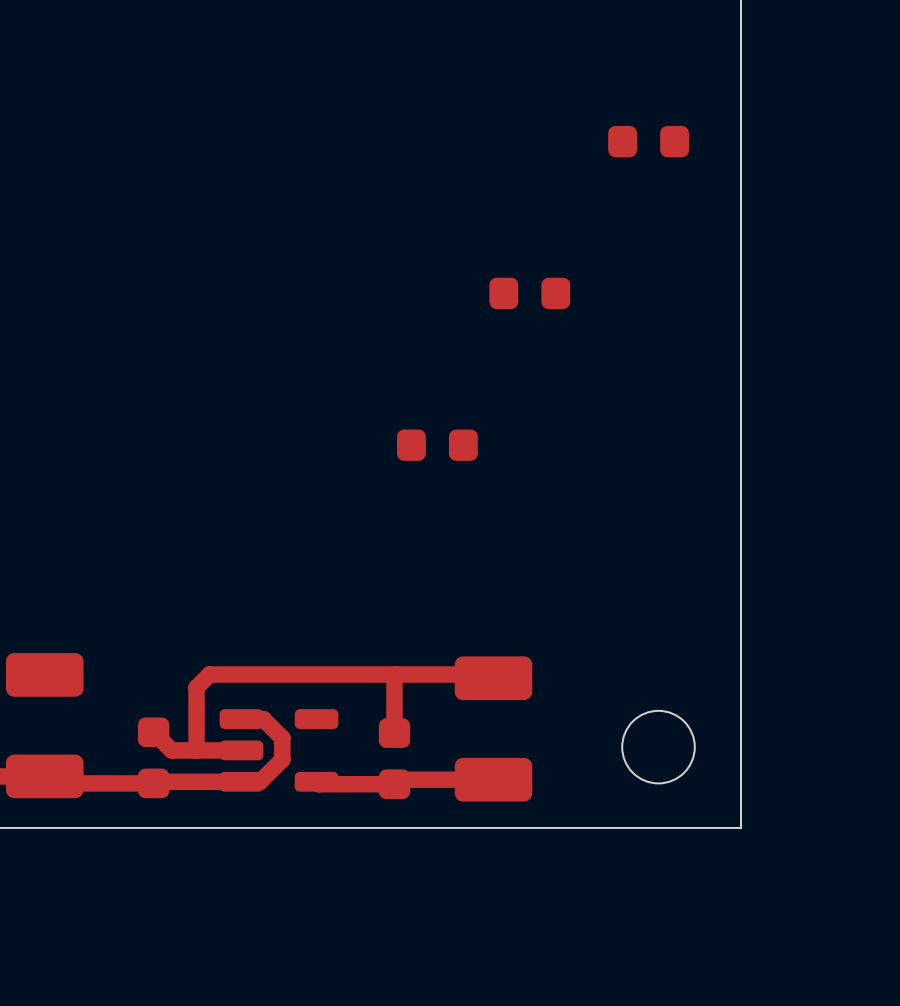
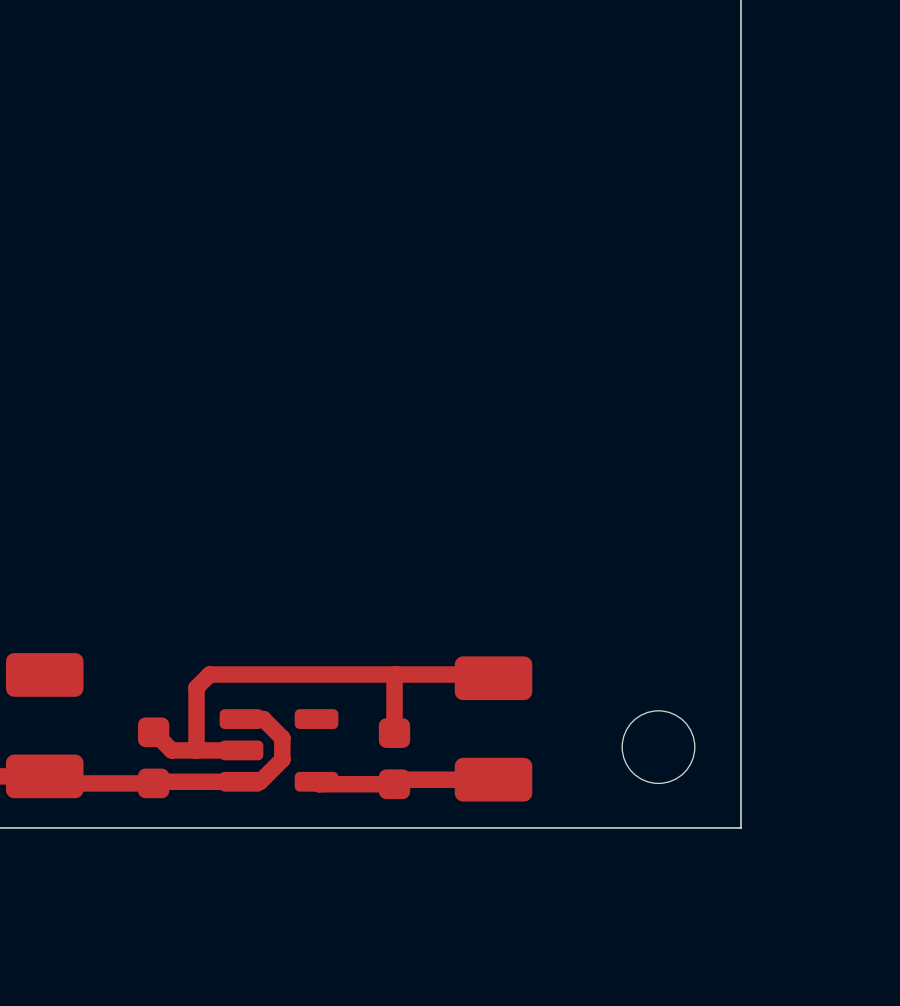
part: (648, 141) -> none
part: (529, 293) -> none
part: (437, 445) -> none

